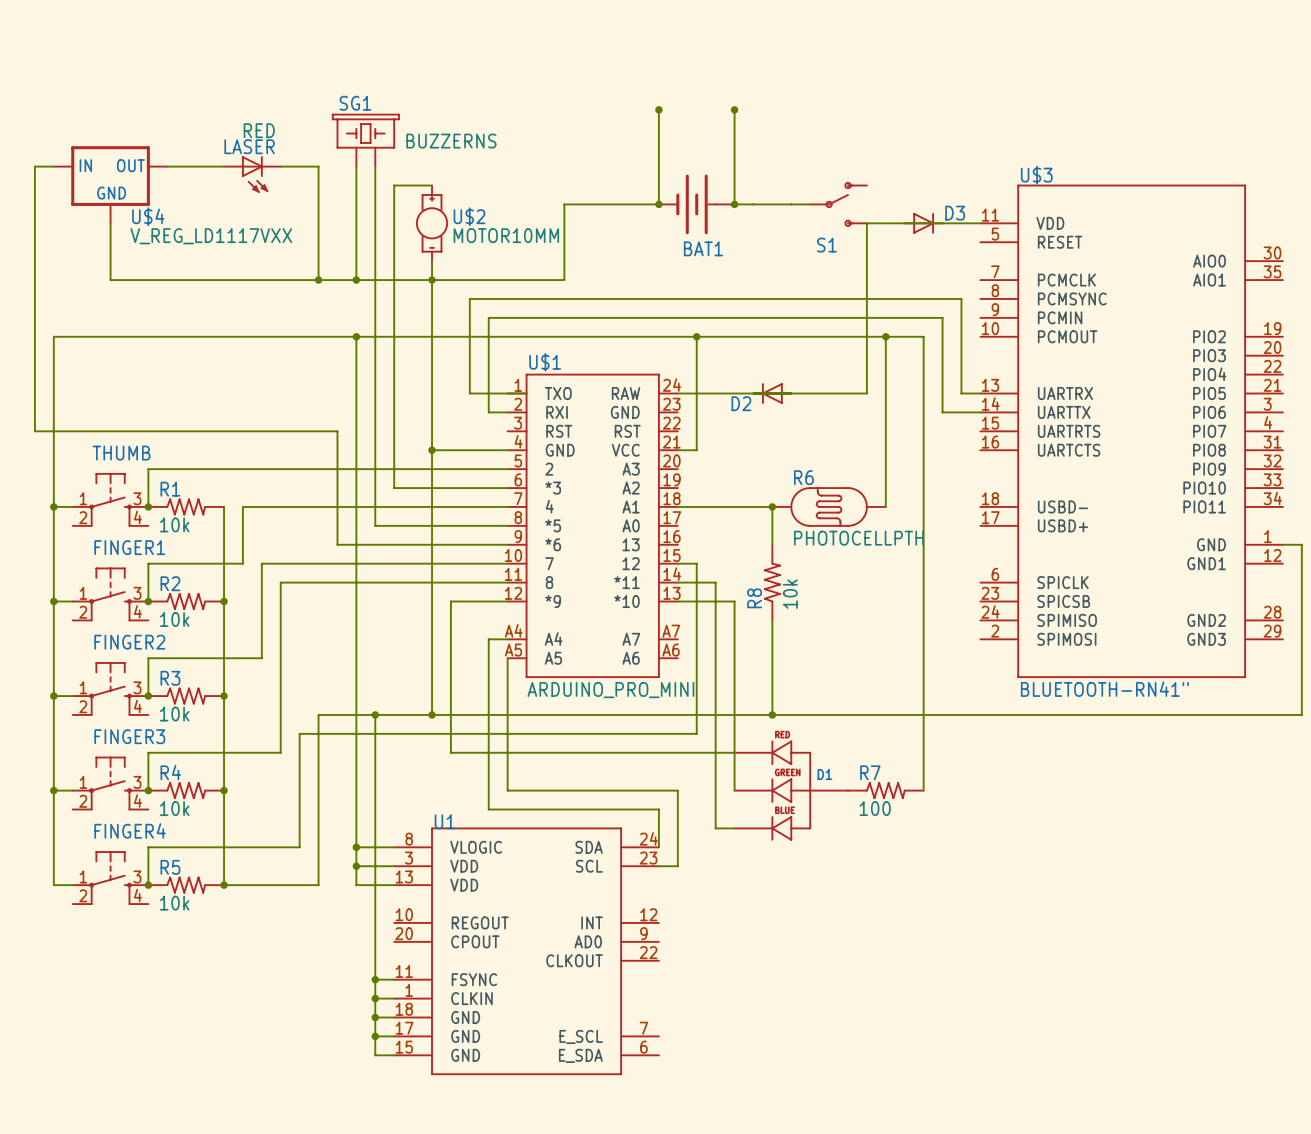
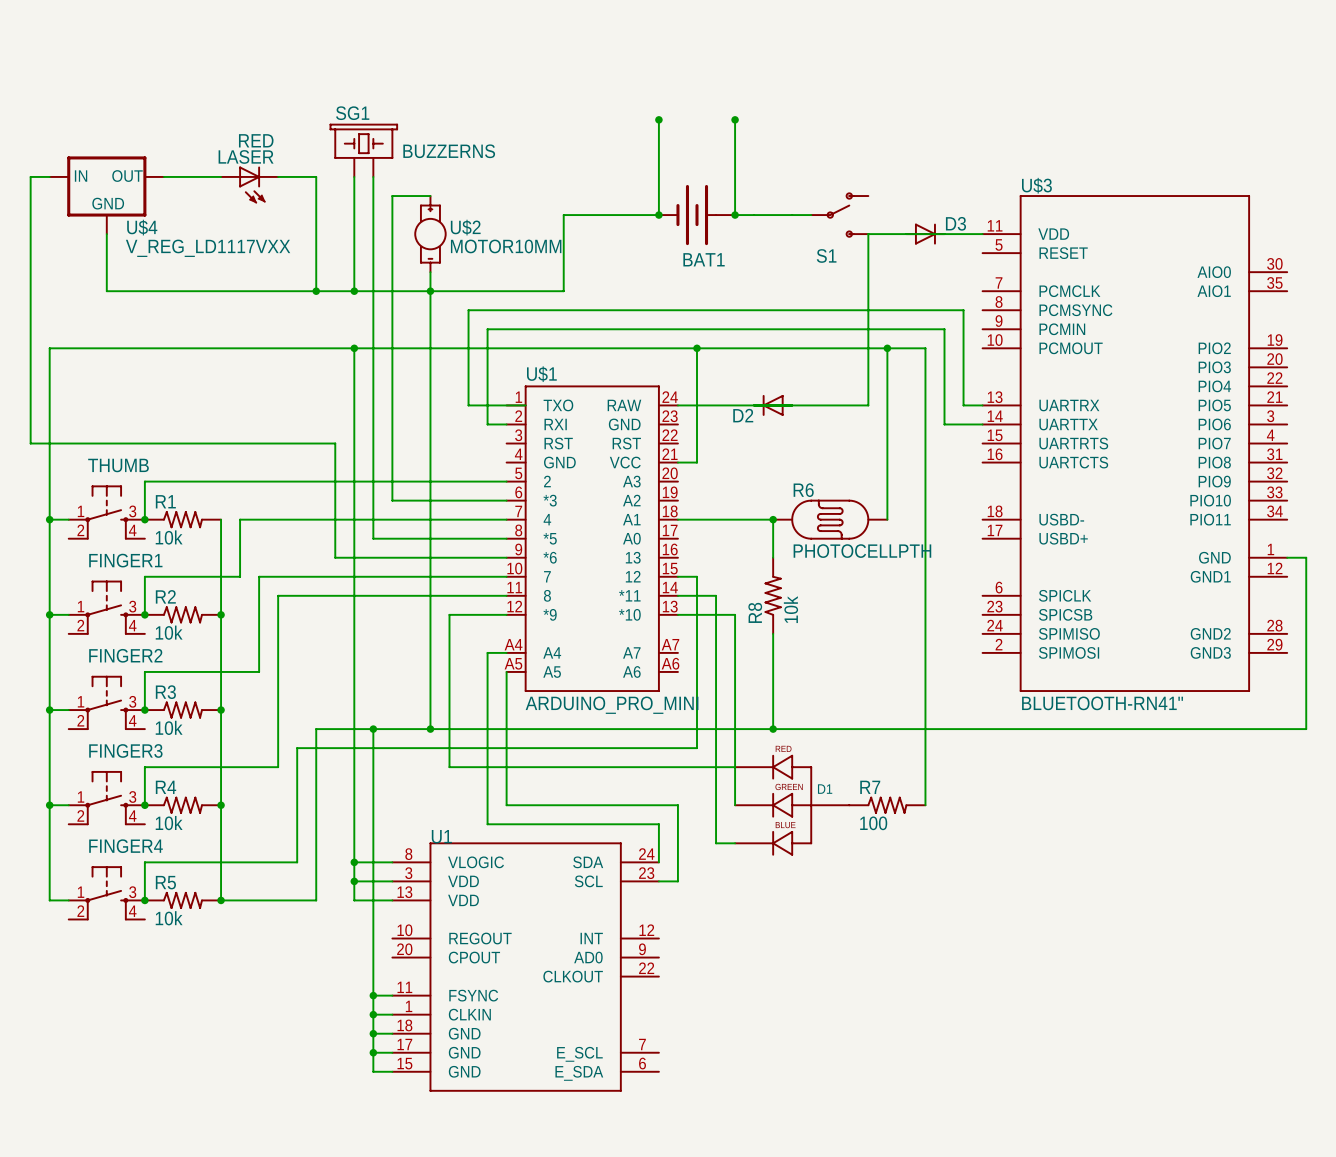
wire: (432, 450) (507, 450) -> none
junction: (432, 450) -> none

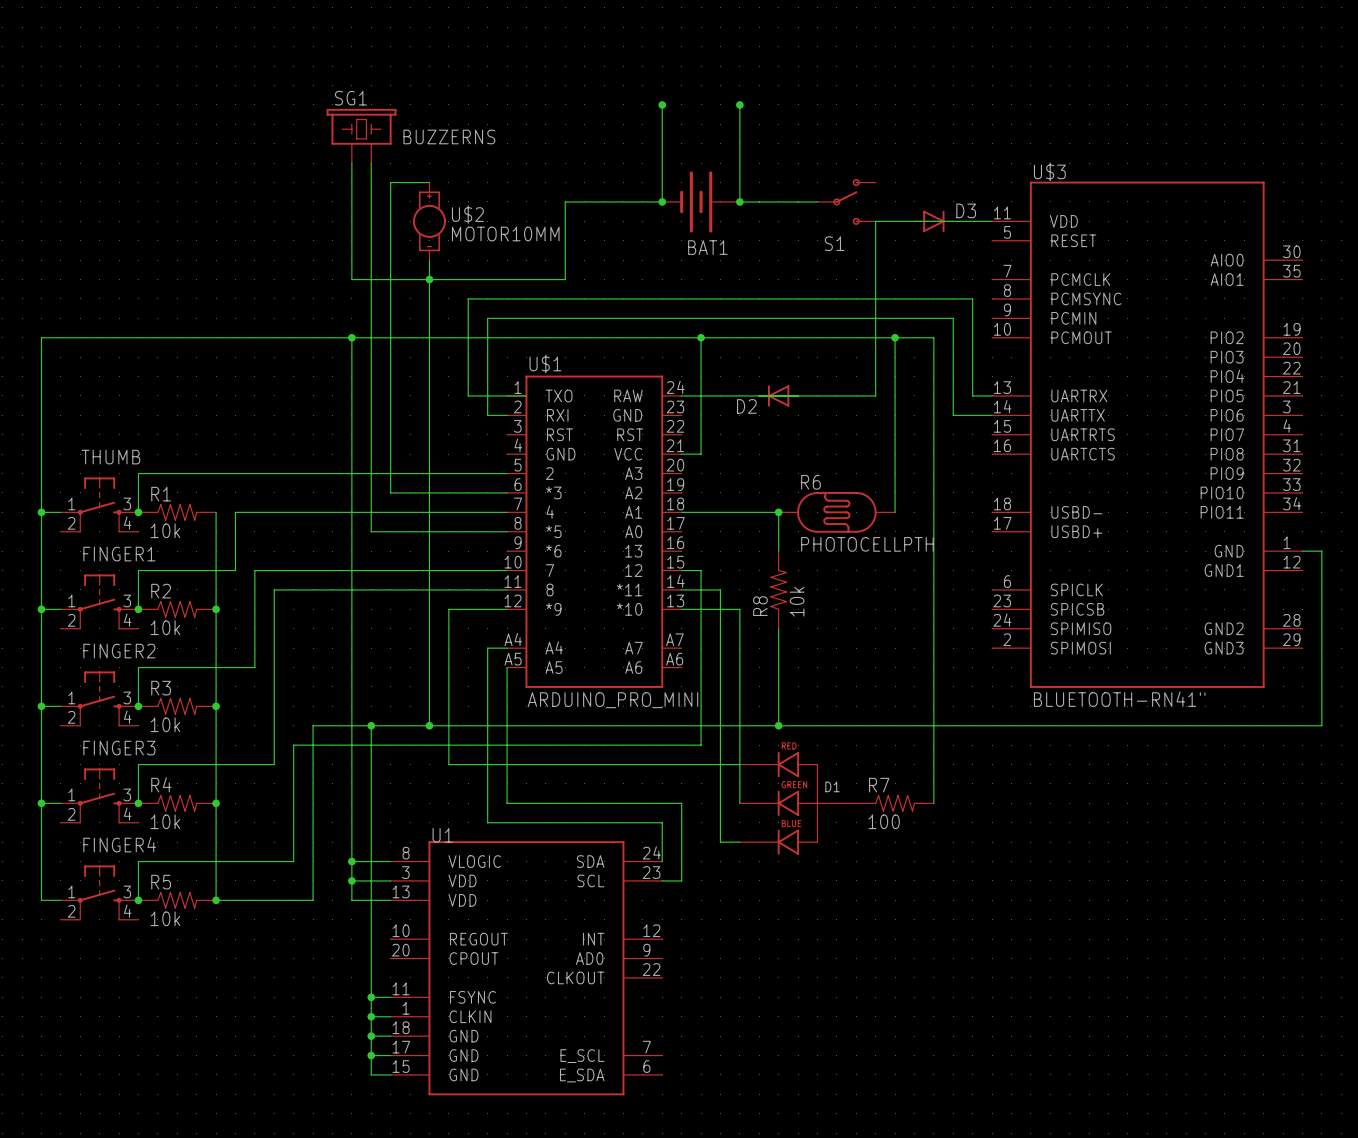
wire: (49, 176) (30, 176) (30, 443) (335, 443) (335, 557) (506, 557) -> none
wire: (163, 176) (221, 176) -> none
wire: (278, 176) (316, 176) (316, 291) -> none
LASER: RED (249, 184) -> none
U$4: V_REG_LD1117VXX (106, 195) -> none
wire: (106, 234) (106, 291) (354, 291) -> none
junction: (316, 291) -> none
junction: (354, 291) -> none

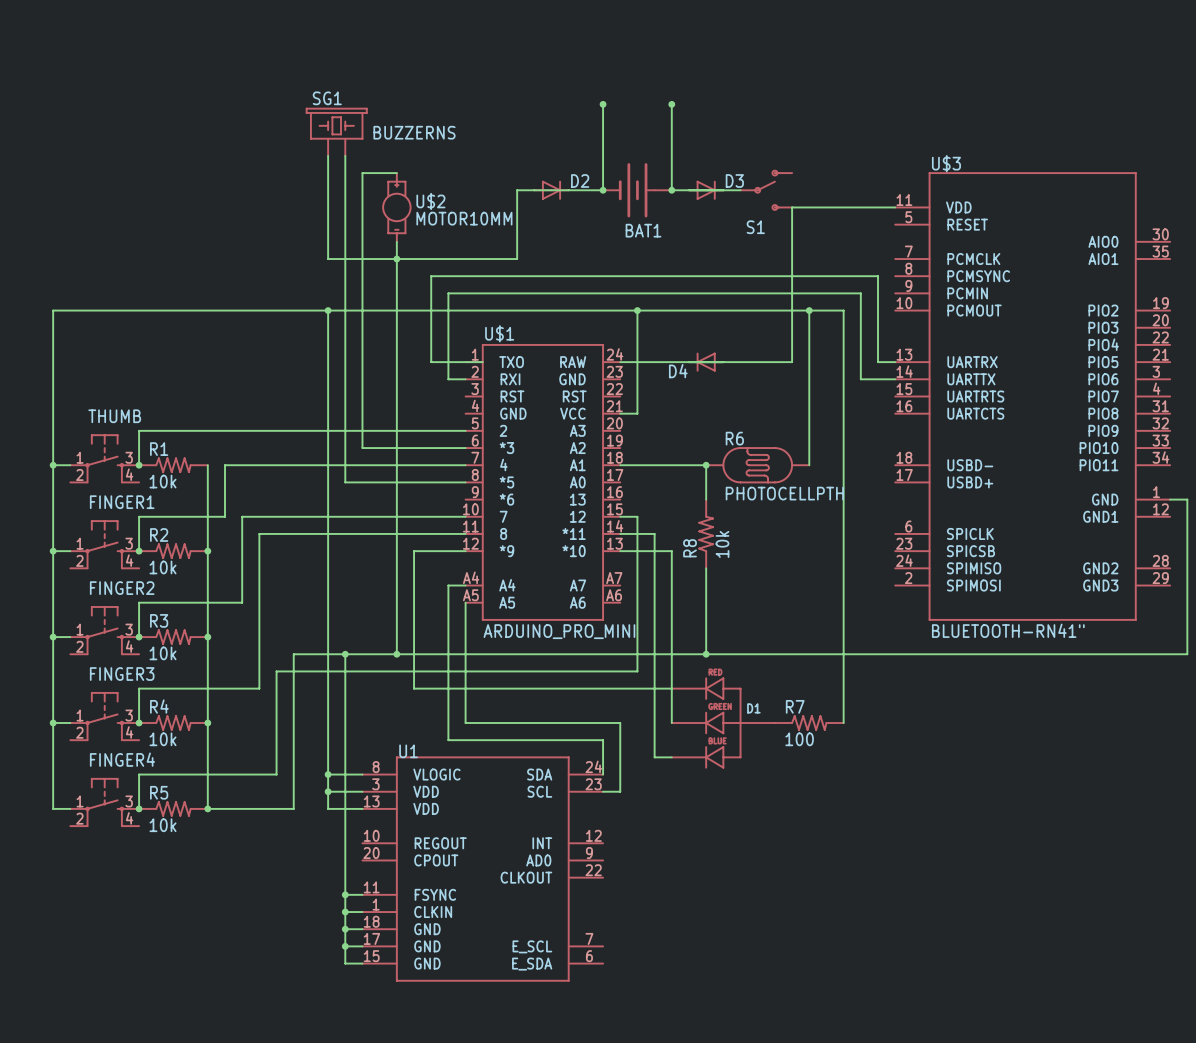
D2: none -> (551, 190)
D3 position: (933, 221) -> (706, 190)
D2 name: D2 (746, 406) -> D4 (678, 371)

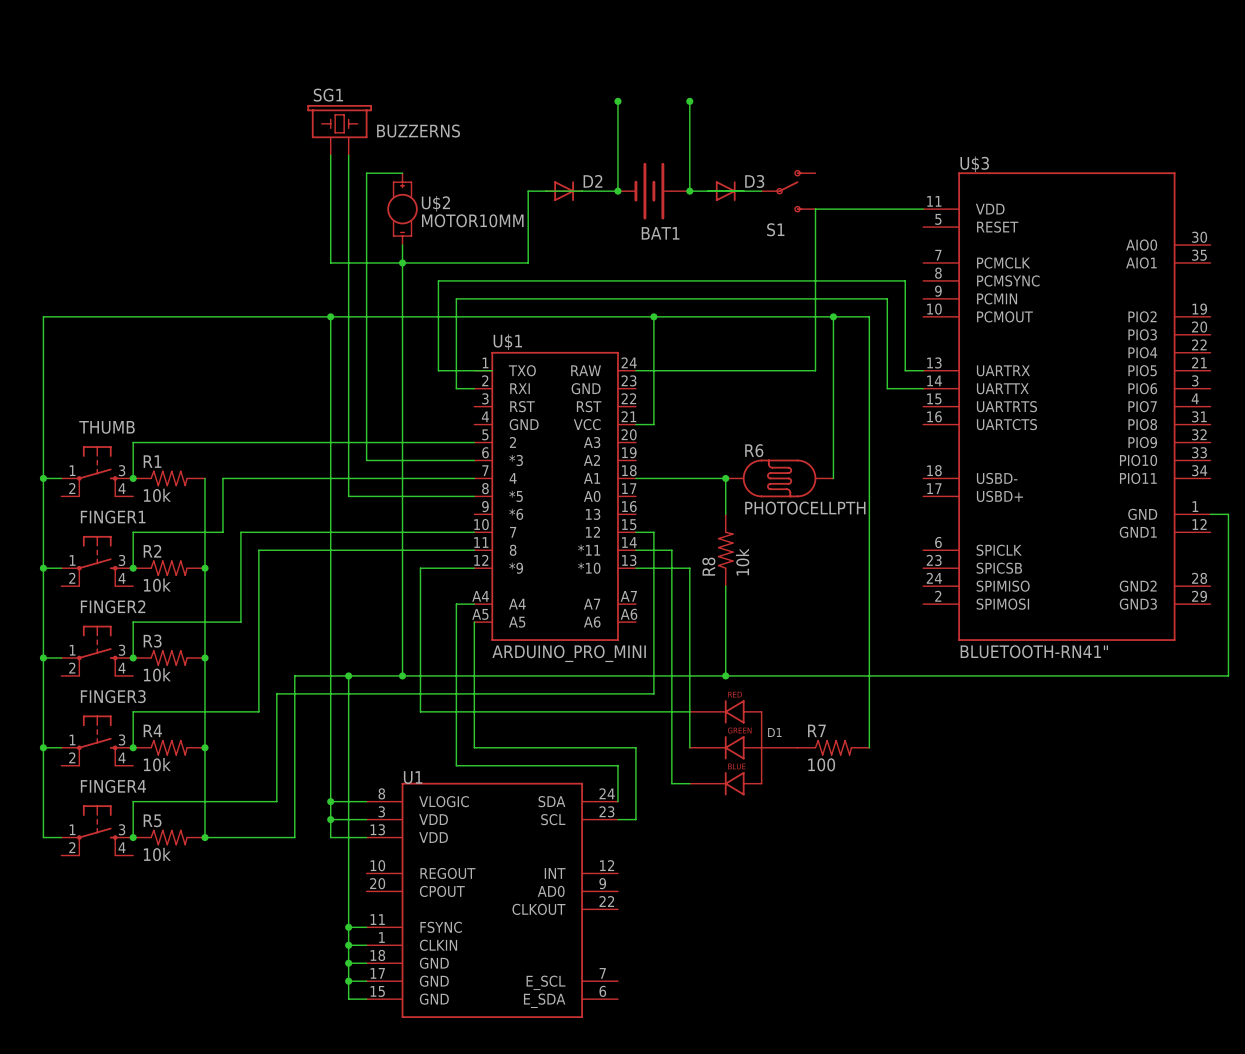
D4: (706, 362) -> none

